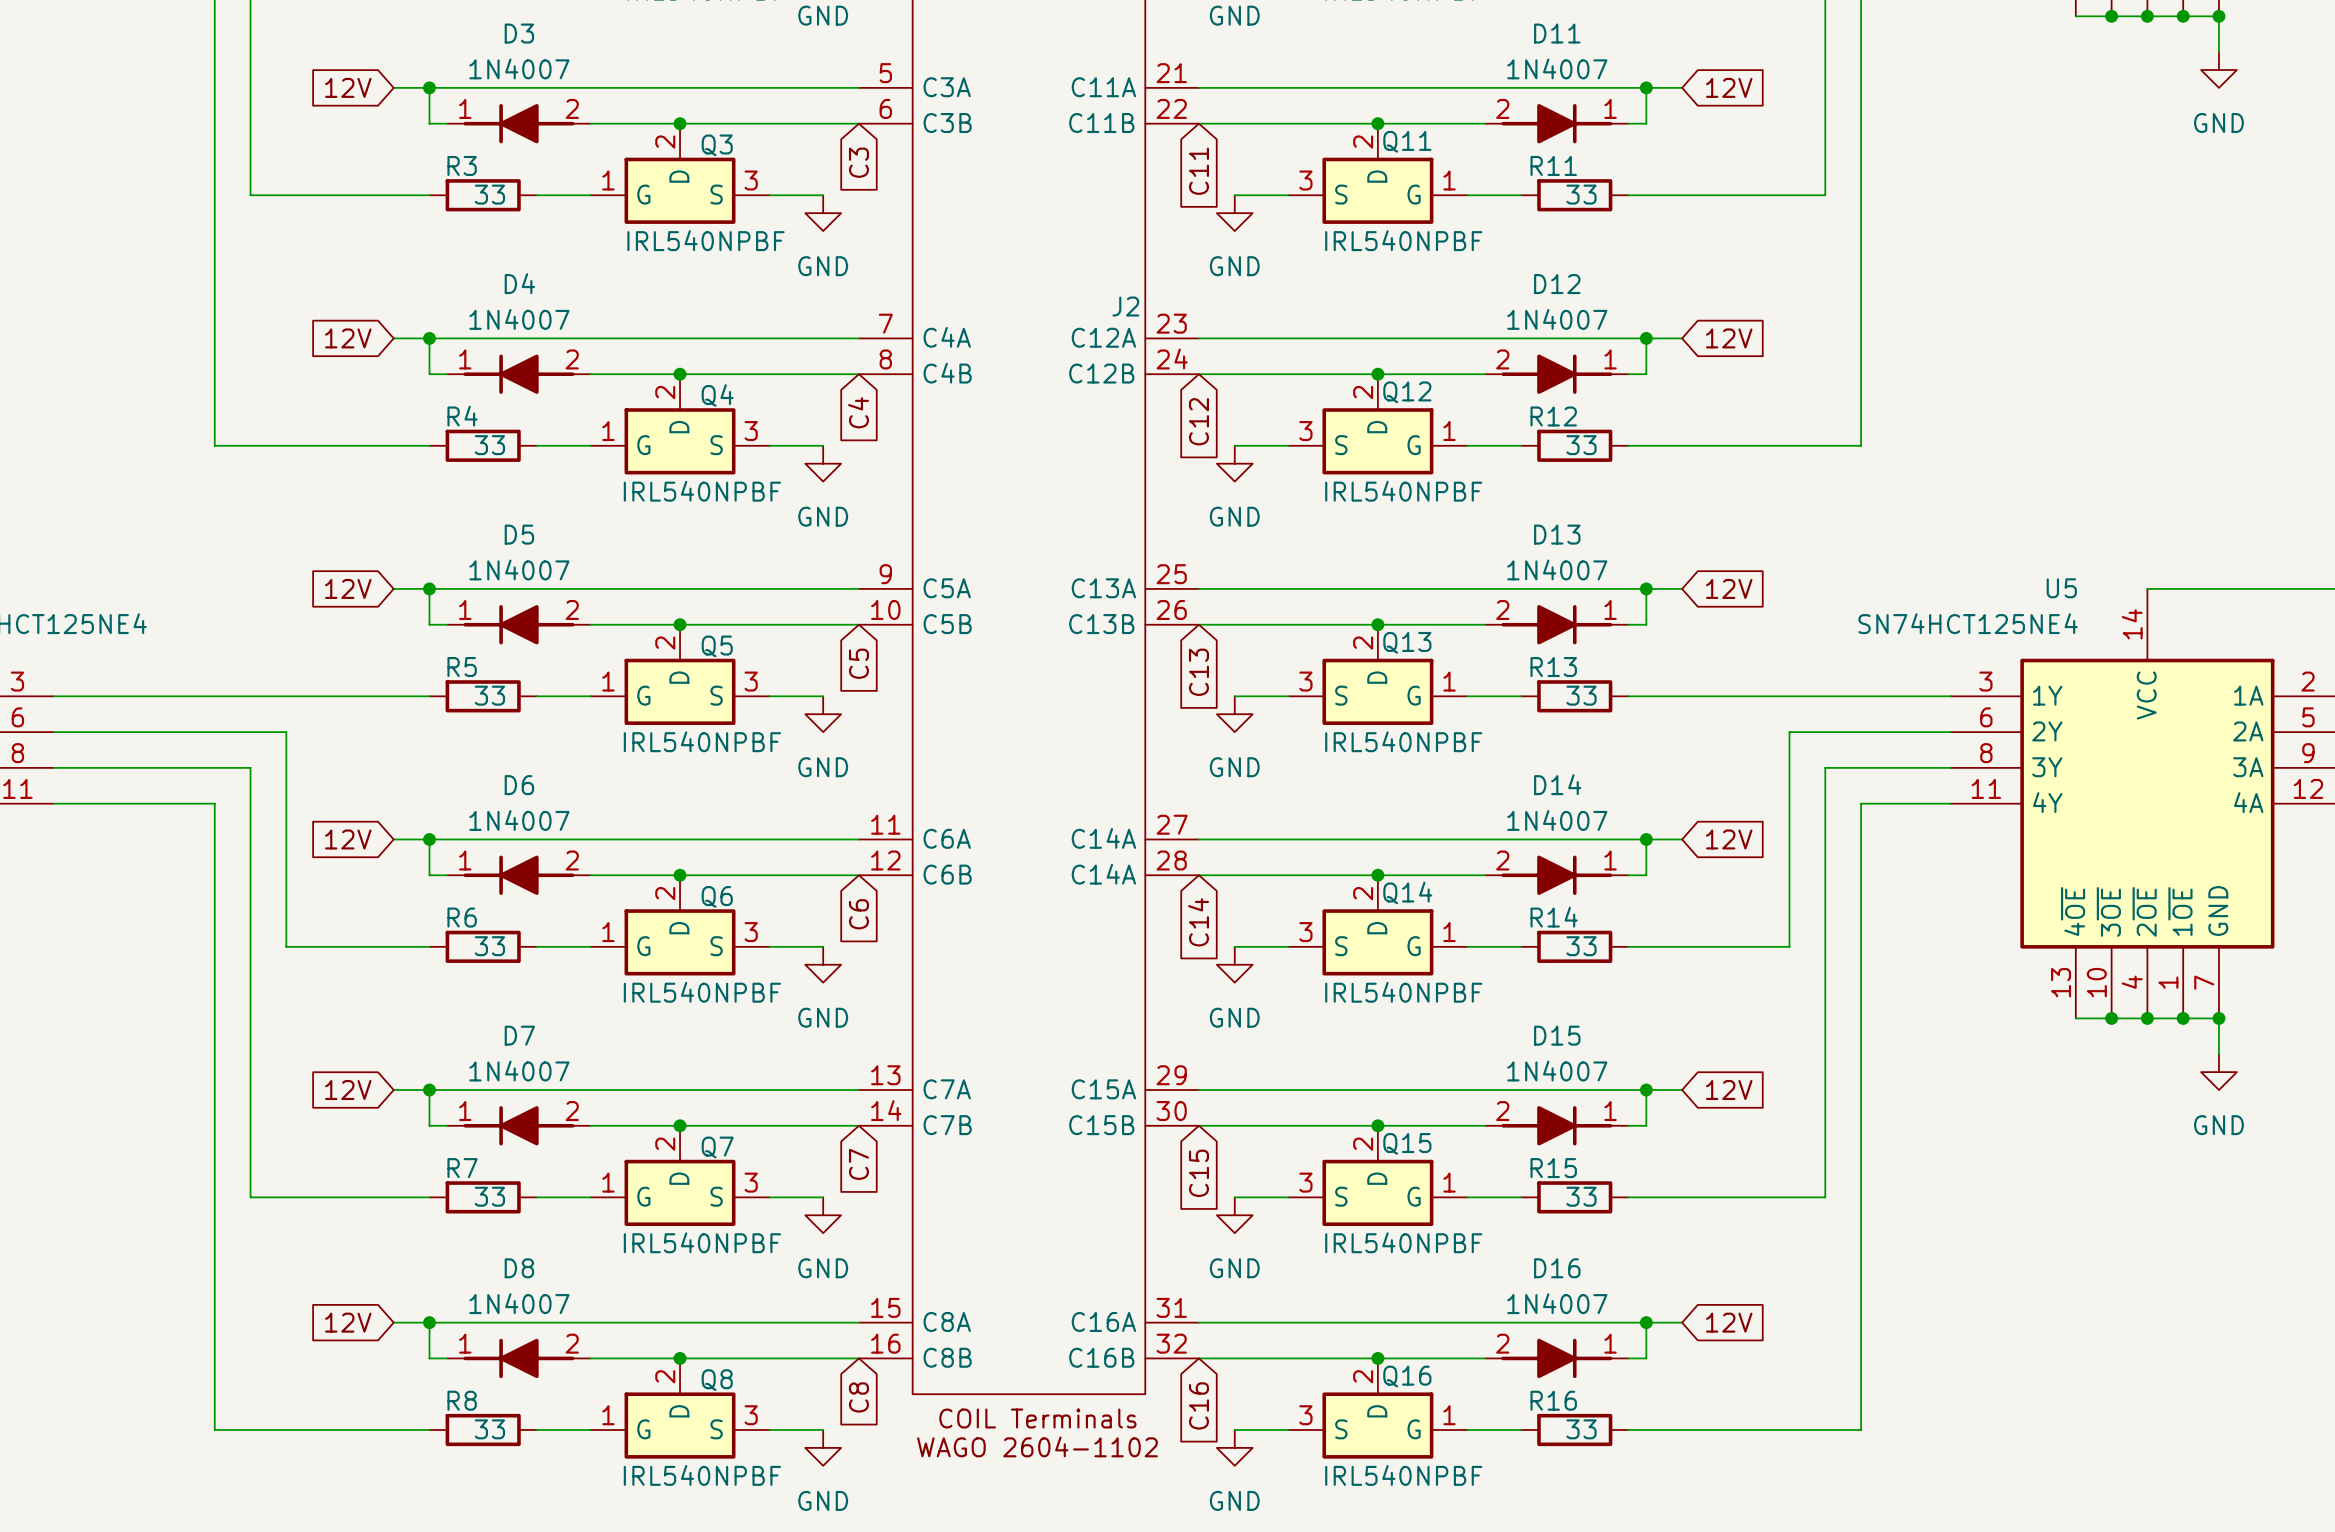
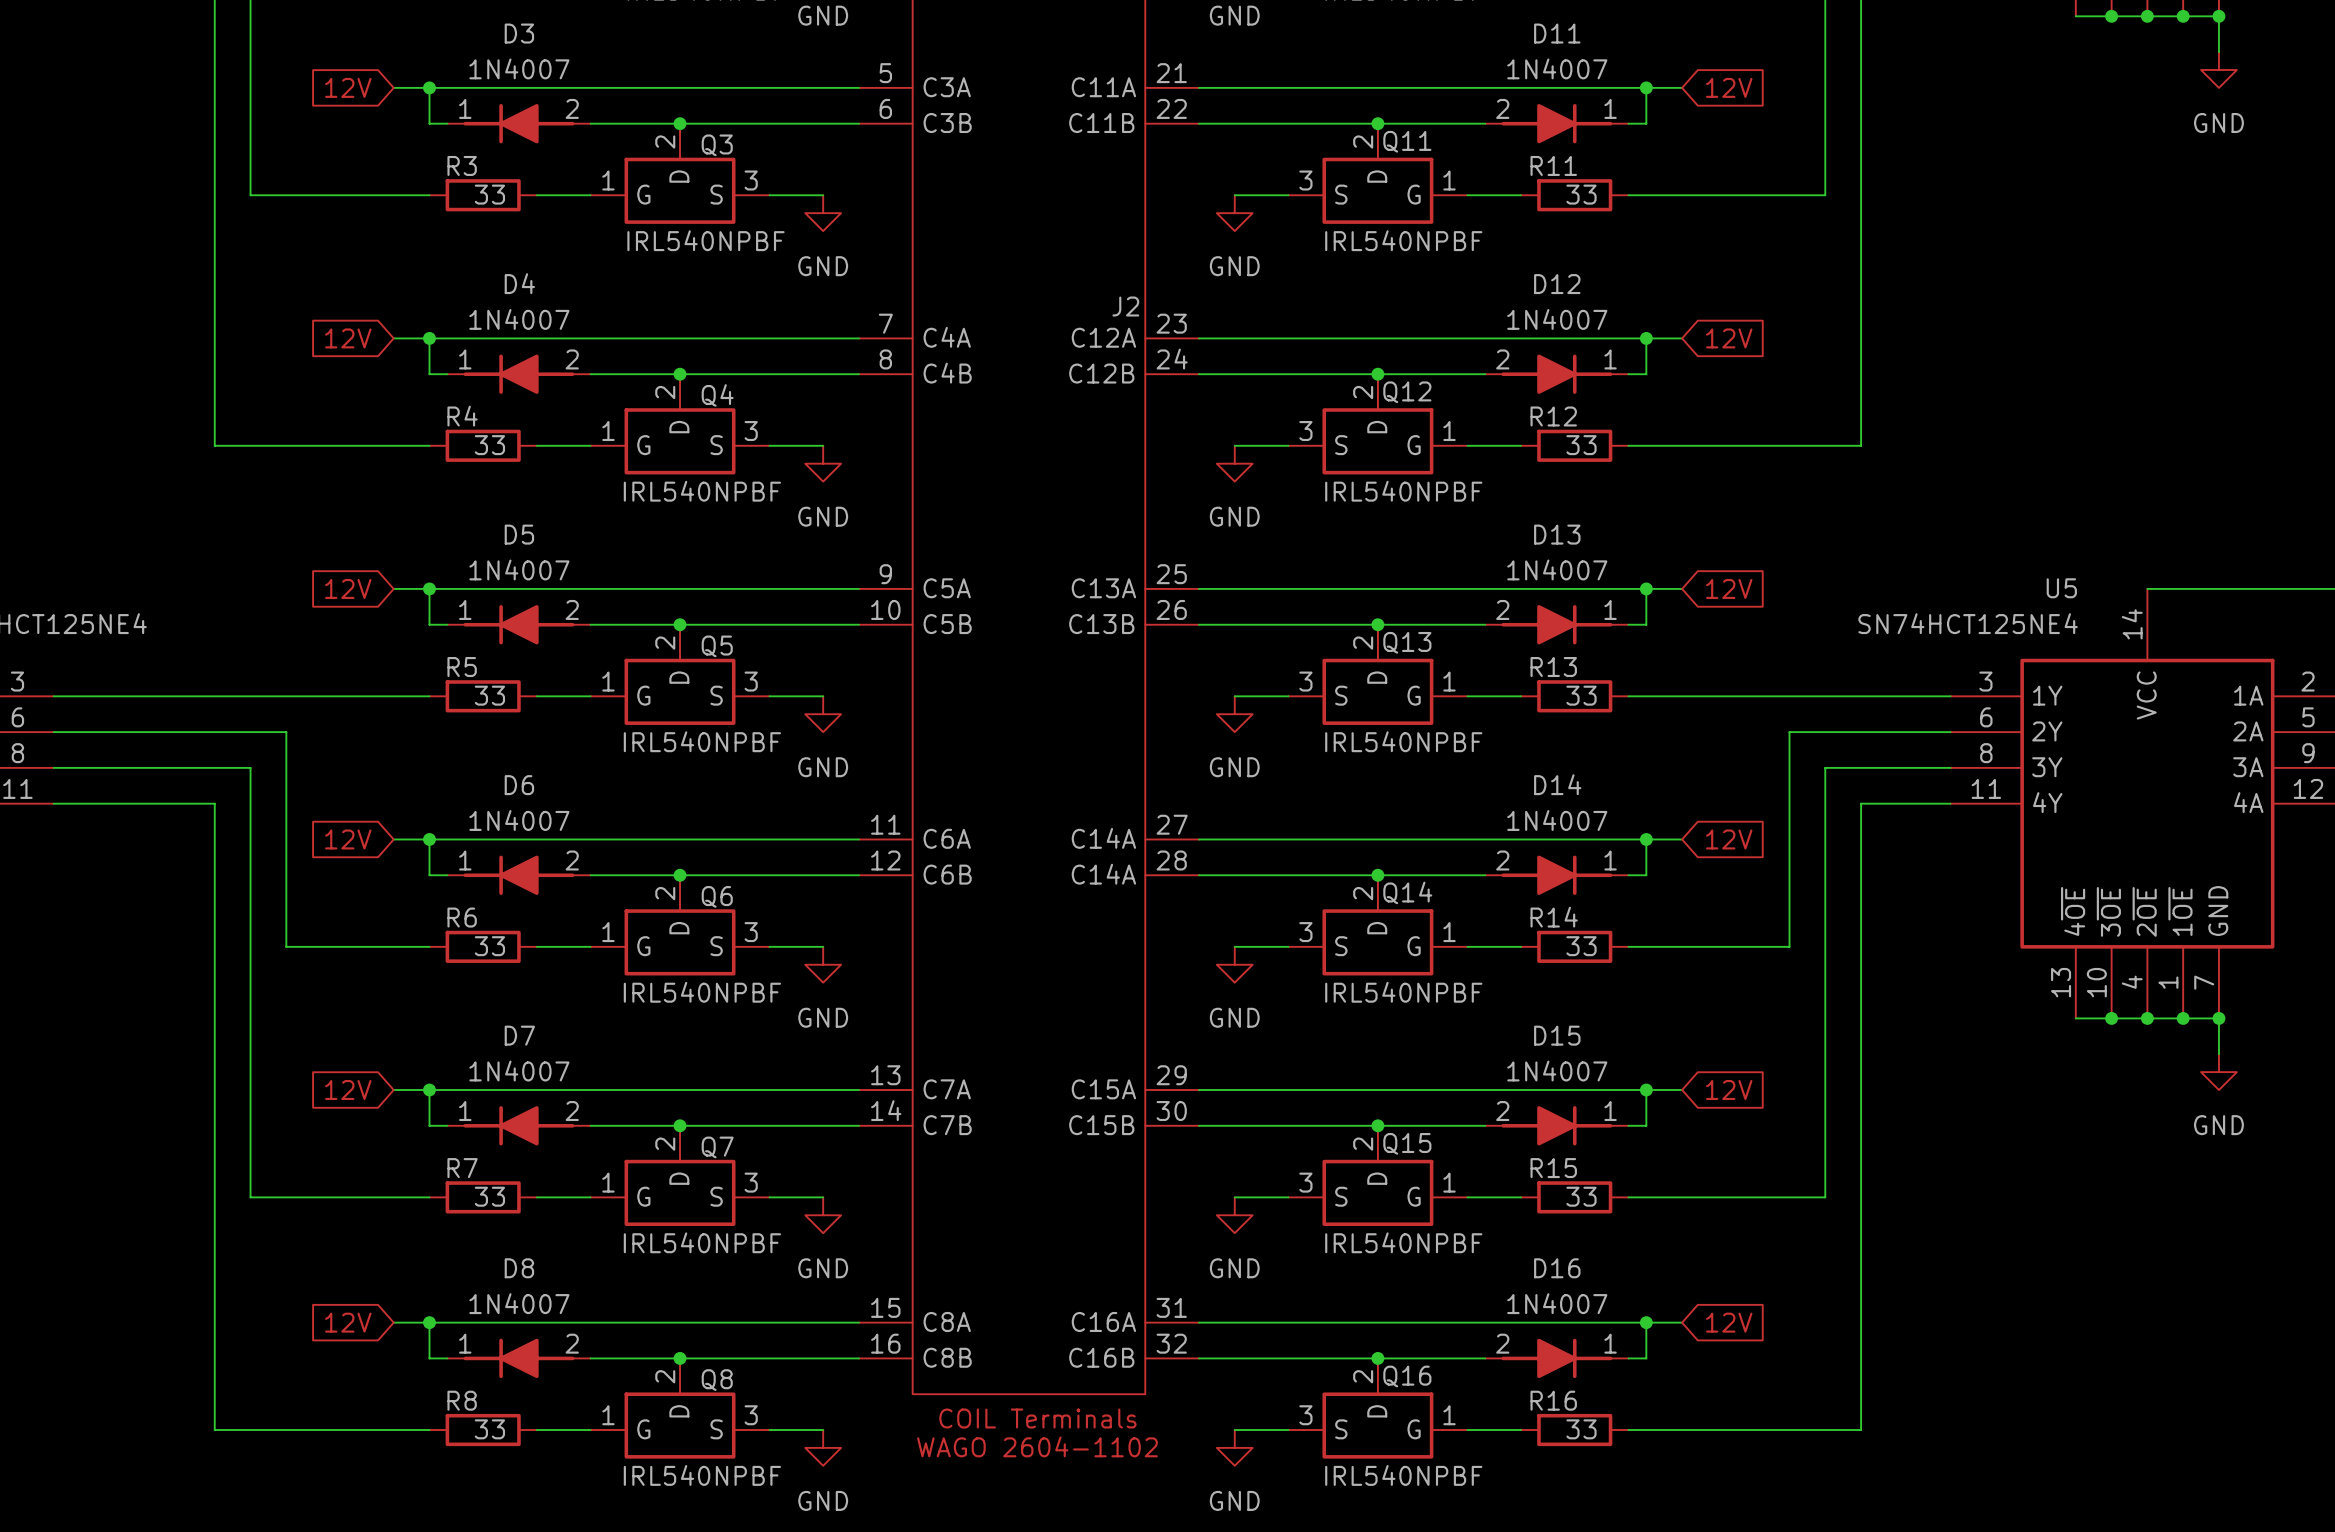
global label: C3 (858, 162) -> none
global label: C11 (1198, 171) -> none
global label: C4 (858, 412) -> none
global label: C12 (1198, 421) -> none
global label: C5 (858, 663) -> none
global label: C13 (1198, 672) -> none
global label: C6 (858, 914) -> none
global label: C14 (1198, 922) -> none
global label: C7 (858, 1164) -> none
global label: C15 (1198, 1173) -> none
global label: C8 (858, 1397) -> none
global label: C16 (1198, 1405) -> none

